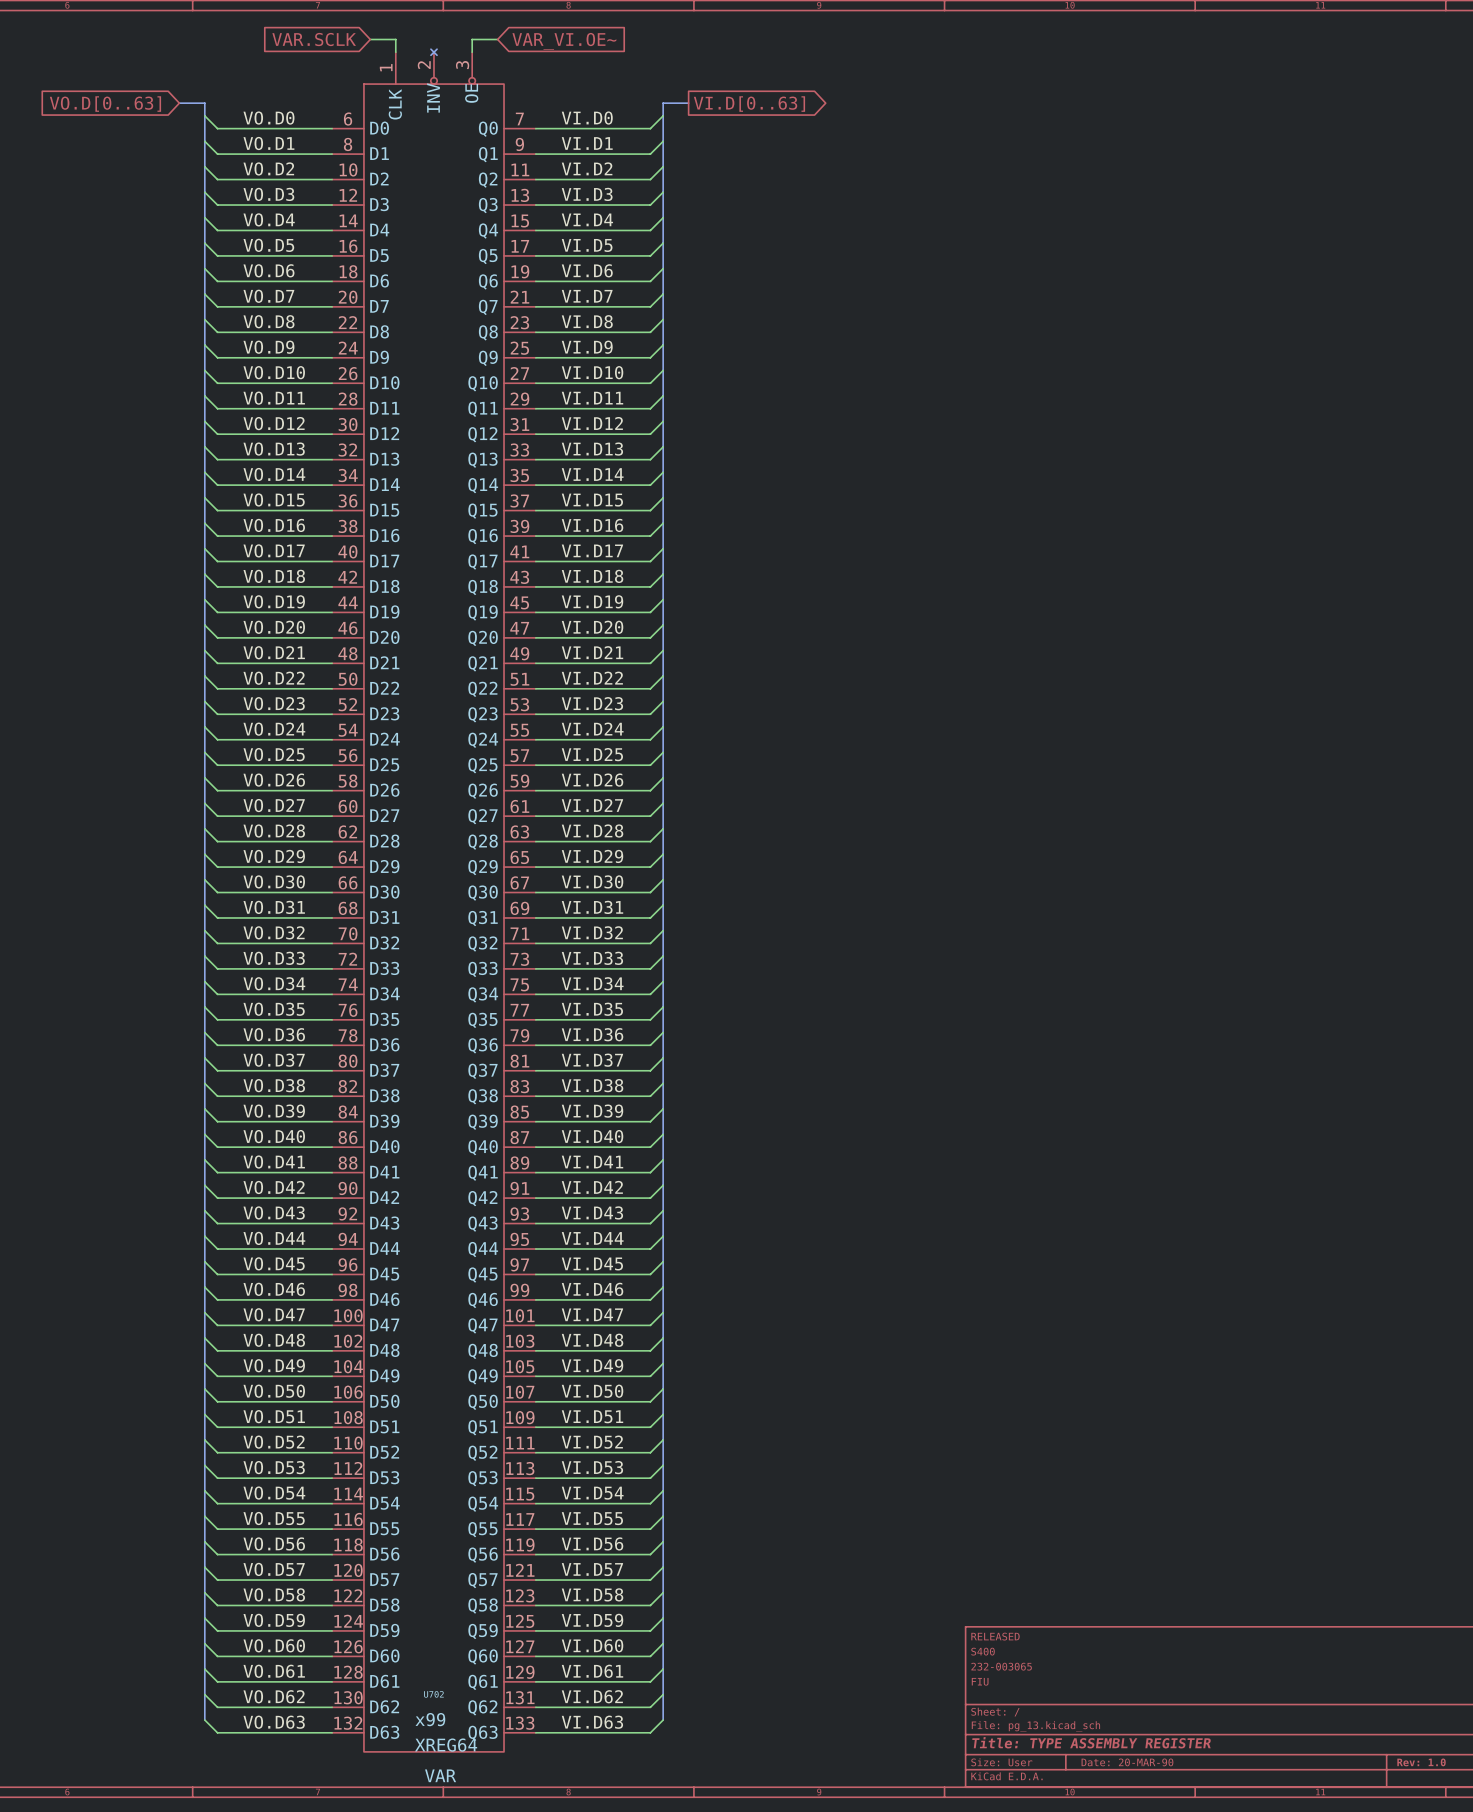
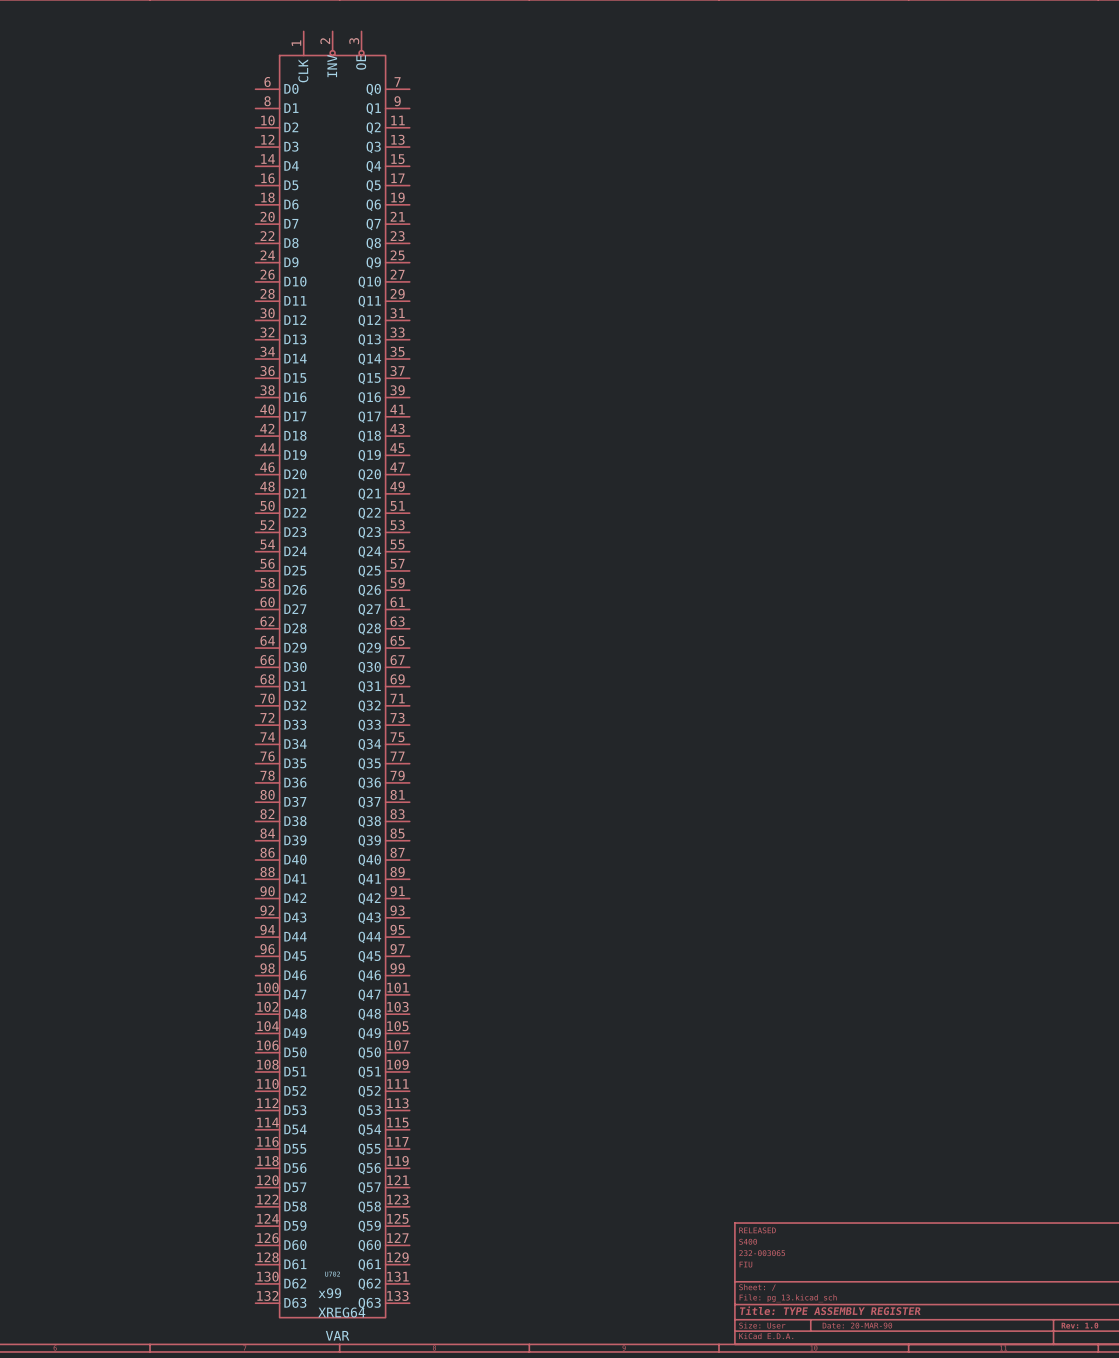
global label: VAR.SCLK (314, 39) -> none
wire: (370, 39) (395, 39) (395, 52) -> none
wire: (497, 39) (472, 39) (472, 52) -> none
global label: VAR_VI.OE~ (564, 41) -> none
no-connect mark: (433, 52) -> none
bus: (179, 103) (204, 103) (204, 1720) -> none
bus: (688, 103) (663, 103) (663, 1720) -> none
global label: VO.D[0..63] (105, 104) -> none
global label: VI.D[0..63] (749, 104) -> none
wire: (204, 115) (217, 128) (332, 128) -> none
wire: (663, 115) (650, 128) (535, 128) -> none
label: VO.D0 (268, 118) -> none
label: VI.D0 (587, 118) -> none
wire: (204, 141) (217, 154) (332, 154) -> none
wire: (663, 141) (650, 154) (535, 154) -> none
label: VO.D1 (268, 143) -> none
label: VI.D1 (587, 143) -> none
wire: (204, 166) (217, 179) (332, 179) -> none
wire: (663, 166) (650, 179) (535, 179) -> none
label: VO.D2 (268, 168) -> none
label: VI.D2 (587, 168) -> none
wire: (204, 192) (217, 205) (332, 205) -> none
wire: (663, 192) (650, 205) (535, 205) -> none
label: VO.D3 (268, 194) -> none
label: VI.D3 (587, 194) -> none
wire: (204, 217) (217, 230) (332, 230) -> none
wire: (663, 217) (650, 230) (535, 230) -> none
label: VO.D4 (269, 219) -> none
label: VI.D4 (587, 219) -> none
wire: (204, 243) (217, 255) (332, 255) -> none
wire: (663, 243) (650, 255) (535, 255) -> none
label: VO.D5 (268, 245) -> none
label: VI.D5 (587, 245) -> none
wire: (204, 268) (217, 281) (332, 281) -> none
wire: (663, 268) (650, 281) (535, 281) -> none
label: VO.D6 (268, 270) -> none
label: VI.D6 (587, 270) -> none
wire: (204, 294) (217, 306) (332, 306) -> none
wire: (663, 294) (650, 306) (535, 306) -> none
label: VO.D7 (268, 296) -> none
label: VI.D7 (587, 296) -> none
wire: (204, 319) (217, 332) (332, 332) -> none
wire: (663, 319) (650, 332) (535, 332) -> none
label: VO.D8 (268, 321) -> none
label: VI.D8 (587, 321) -> none
wire: (204, 345) (217, 357) (332, 357) -> none
wire: (663, 345) (650, 357) (535, 357) -> none
label: VO.D9 (268, 347) -> none
label: VI.D9 (587, 347) -> none
wire: (204, 370) (217, 383) (332, 383) -> none
wire: (663, 370) (650, 383) (535, 383) -> none
label: VO.D10 (274, 372) -> none
label: VI.D10 (592, 372) -> none
wire: (204, 395) (217, 408) (332, 408) -> none
wire: (663, 395) (650, 408) (535, 408) -> none
label: VO.D11 (274, 398) -> none
label: VI.D11 (592, 398) -> none
wire: (204, 421) (217, 434) (332, 434) -> none
wire: (663, 421) (650, 434) (535, 434) -> none
label: VO.D12 (274, 423) -> none
label: VI.D12 (592, 423) -> none
wire: (204, 446) (217, 459) (332, 459) -> none
wire: (663, 446) (650, 459) (535, 459) -> none
label: VO.D13 (274, 449) -> none
label: VI.D13 (592, 449) -> none
wire: (204, 472) (217, 485) (332, 485) -> none
wire: (663, 472) (650, 485) (535, 485) -> none
label: VO.D14 (274, 474) -> none
label: VI.D14 (592, 474) -> none
wire: (204, 497) (217, 510) (332, 510) -> none
wire: (663, 497) (650, 510) (535, 510) -> none
label: VO.D15 (274, 499) -> none
label: VI.D15 (592, 500) -> none
wire: (204, 523) (217, 536) (332, 536) -> none
wire: (663, 523) (650, 536) (535, 536) -> none
label: VO.D16 (274, 525) -> none
label: VI.D16 (592, 525) -> none
wire: (204, 548) (217, 561) (332, 561) -> none
wire: (663, 548) (650, 561) (535, 561) -> none
label: VO.D17 (274, 550) -> none
label: VI.D17 (592, 550) -> none
wire: (204, 574) (217, 586) (332, 586) -> none
wire: (663, 574) (650, 586) (535, 586) -> none
label: VO.D18 (274, 576) -> none
label: VI.D18 (592, 576) -> none
wire: (204, 599) (217, 612) (332, 612) -> none
wire: (663, 599) (650, 612) (535, 612) -> none
label: VO.D19 (274, 601) -> none
label: VI.D19 (592, 601) -> none
wire: (204, 625) (217, 637) (332, 637) -> none
wire: (663, 625) (650, 637) (535, 637) -> none
label: VO.D20 (274, 627) -> none
label: VI.D20 (592, 627) -> none
wire: (204, 650) (217, 663) (332, 663) -> none
wire: (663, 650) (650, 663) (535, 663) -> none
label: VO.D21 (274, 652) -> none
label: VI.D21 (592, 652) -> none
wire: (204, 676) (217, 688) (332, 688) -> none
wire: (663, 676) (650, 688) (535, 688) -> none
label: VO.D22 (274, 678) -> none
label: VI.D22 (592, 678) -> none
wire: (204, 701) (217, 714) (332, 714) -> none
wire: (663, 701) (650, 714) (535, 714) -> none
label: VO.D23 (274, 703) -> none
label: VI.D23 (592, 703) -> none
wire: (204, 727) (217, 739) (332, 739) -> none
wire: (663, 727) (650, 739) (535, 739) -> none
label: VO.D24 (274, 729) -> none
label: VI.D24 (592, 729) -> none
wire: (204, 752) (217, 765) (332, 765) -> none
wire: (663, 752) (650, 765) (535, 765) -> none
label: VO.D25 (274, 754) -> none
label: VI.D25 (592, 754) -> none
wire: (204, 777) (217, 790) (332, 790) -> none
wire: (663, 777) (650, 790) (535, 790) -> none
label: VO.D26 (274, 780) -> none
label: VI.D26 (592, 780) -> none
wire: (204, 803) (217, 816) (332, 816) -> none
wire: (663, 803) (650, 816) (535, 816) -> none
label: VO.D27 (274, 805) -> none
label: VI.D27 (592, 805) -> none
wire: (204, 828) (217, 841) (332, 841) -> none
wire: (663, 828) (650, 841) (535, 841) -> none
label: VO.D28 (274, 831) -> none
label: VI.D28 (592, 831) -> none
wire: (204, 854) (217, 867) (332, 867) -> none
wire: (663, 854) (650, 867) (535, 867) -> none
label: VO.D29 (274, 856) -> none
label: VI.D29 (592, 856) -> none
wire: (204, 879) (217, 892) (332, 892) -> none
wire: (663, 879) (650, 892) (535, 892) -> none
label: VO.D30 (274, 881) -> none
label: VI.D30 (592, 881) -> none
wire: (204, 905) (217, 917) (332, 917) -> none
wire: (663, 905) (650, 917) (535, 917) -> none
label: VO.D31 (274, 907) -> none
label: VI.D31 (592, 907) -> none
wire: (204, 930) (217, 943) (332, 943) -> none
wire: (663, 930) (650, 943) (535, 943) -> none
label: VO.D32 (274, 932) -> none
label: VI.D32 (592, 932) -> none
wire: (204, 956) (217, 968) (332, 968) -> none
wire: (663, 956) (650, 968) (535, 968) -> none
label: VO.D33 (274, 958) -> none
label: VI.D33 (592, 958) -> none
wire: (204, 981) (217, 994) (332, 994) -> none
wire: (663, 981) (650, 994) (535, 994) -> none
label: VO.D34 (274, 983) -> none
label: VI.D34 (592, 983) -> none
wire: (204, 1007) (217, 1019) (332, 1019) -> none
wire: (663, 1007) (650, 1019) (535, 1019) -> none
label: VO.D35 (274, 1009) -> none
label: VI.D35 (592, 1009) -> none
wire: (204, 1032) (217, 1045) (332, 1045) -> none
wire: (663, 1032) (650, 1045) (535, 1045) -> none
label: VO.D36 (274, 1034) -> none
label: VI.D36 (592, 1034) -> none
wire: (204, 1058) (217, 1070) (332, 1070) -> none
wire: (663, 1058) (650, 1070) (535, 1070) -> none
label: VO.D37 (274, 1060) -> none
label: VI.D37 (592, 1060) -> none
wire: (204, 1083) (217, 1096) (332, 1096) -> none
wire: (663, 1083) (650, 1096) (535, 1096) -> none
label: VO.D38 (274, 1085) -> none
label: VI.D38 (592, 1085) -> none
wire: (204, 1108) (217, 1121) (332, 1121) -> none
wire: (663, 1108) (650, 1121) (535, 1121) -> none
label: VO.D39 (274, 1111) -> none
label: VI.D39 (592, 1111) -> none
wire: (204, 1134) (217, 1147) (332, 1147) -> none
wire: (663, 1134) (650, 1147) (535, 1147) -> none
label: VO.D40 (274, 1136) -> none
label: VI.D40 (592, 1136) -> none
wire: (204, 1159) (217, 1172) (332, 1172) -> none
wire: (663, 1159) (650, 1172) (535, 1172) -> none
label: VO.D41 (274, 1162) -> none
label: VI.D41 (592, 1162) -> none
wire: (204, 1185) (217, 1198) (332, 1198) -> none
wire: (663, 1185) (650, 1198) (535, 1198) -> none
label: VO.D42 (274, 1187) -> none
label: VI.D42 (592, 1187) -> none
wire: (204, 1210) (217, 1223) (332, 1223) -> none
wire: (663, 1210) (650, 1223) (535, 1223) -> none
label: VO.D43 (274, 1212) -> none
label: VI.D43 (592, 1212) -> none
wire: (204, 1236) (217, 1249) (332, 1249) -> none
wire: (663, 1236) (650, 1249) (535, 1249) -> none
label: VO.D44 (274, 1238) -> none
label: VI.D44 (592, 1238) -> none
wire: (204, 1261) (217, 1274) (332, 1274) -> none
wire: (663, 1261) (650, 1274) (535, 1274) -> none
label: VO.D45 (274, 1263) -> none
label: VI.D45 (592, 1263) -> none
wire: (204, 1287) (217, 1299) (332, 1299) -> none
wire: (663, 1287) (650, 1299) (535, 1299) -> none
label: VO.D46 (274, 1289) -> none
label: VI.D46 (592, 1289) -> none
wire: (204, 1312) (217, 1325) (332, 1325) -> none
wire: (663, 1312) (650, 1325) (535, 1325) -> none
label: VO.D47 (274, 1314) -> none
label: VI.D47 (592, 1314) -> none
wire: (204, 1338) (217, 1350) (332, 1350) -> none
wire: (663, 1338) (650, 1350) (535, 1350) -> none
label: VO.D48 (274, 1340) -> none
label: VI.D48 (592, 1340) -> none
wire: (204, 1363) (217, 1376) (332, 1376) -> none
wire: (663, 1363) (650, 1376) (535, 1376) -> none
label: VO.D49 (274, 1365) -> none
label: VI.D49 (592, 1365) -> none
wire: (204, 1389) (217, 1401) (332, 1401) -> none
wire: (663, 1389) (650, 1401) (535, 1401) -> none
label: VO.D50 (274, 1391) -> none
label: VI.D50 (592, 1391) -> none
wire: (204, 1414) (217, 1427) (332, 1427) -> none
wire: (663, 1414) (650, 1427) (535, 1427) -> none
label: VO.D51 (274, 1416) -> none
label: VI.D51 (592, 1416) -> none
wire: (204, 1439) (217, 1452) (332, 1452) -> none
wire: (663, 1439) (650, 1452) (535, 1452) -> none
label: VO.D52 (274, 1442) -> none
label: VI.D52 (592, 1442) -> none
wire: (204, 1465) (217, 1478) (332, 1478) -> none
wire: (663, 1465) (650, 1478) (535, 1478) -> none
label: VO.D53 (274, 1467) -> none
label: VI.D53 (592, 1467) -> none
wire: (204, 1490) (217, 1503) (332, 1503) -> none
wire: (663, 1490) (650, 1503) (535, 1503) -> none
label: VO.D54 (274, 1493) -> none
label: VI.D54 (592, 1493) -> none
wire: (204, 1516) (217, 1529) (332, 1529) -> none
wire: (663, 1516) (650, 1529) (535, 1529) -> none
label: VO.D55 (274, 1518) -> none
label: VI.D55 (592, 1518) -> none
wire: (204, 1541) (217, 1554) (332, 1554) -> none
wire: (663, 1541) (650, 1554) (535, 1554) -> none
label: VO.D56 (274, 1543) -> none
label: VI.D56 (592, 1543) -> none
wire: (204, 1567) (217, 1580) (332, 1580) -> none
wire: (663, 1567) (650, 1580) (535, 1580) -> none
label: VO.D57 (274, 1569) -> none
label: VI.D57 (592, 1569) -> none
wire: (204, 1592) (217, 1605) (332, 1605) -> none
wire: (663, 1592) (650, 1605) (535, 1605) -> none
label: VO.D58 (274, 1594) -> none
label: VI.D58 (592, 1594) -> none
wire: (204, 1618) (217, 1630) (332, 1630) -> none
wire: (663, 1618) (650, 1630) (535, 1630) -> none
label: VO.D59 (274, 1620) -> none
label: VI.D59 (592, 1620) -> none
wire: (204, 1643) (217, 1656) (332, 1656) -> none
wire: (663, 1643) (650, 1656) (535, 1656) -> none
label: VO.D60 (274, 1645) -> none
label: VI.D60 (592, 1645) -> none
wire: (204, 1669) (217, 1681) (332, 1681) -> none
wire: (663, 1669) (650, 1681) (535, 1681) -> none
label: VO.D61 (274, 1671) -> none
label: VI.D61 (592, 1671) -> none
wire: (204, 1694) (217, 1707) (332, 1707) -> none
wire: (663, 1694) (650, 1707) (535, 1707) -> none
label: VO.D62 (274, 1696) -> none
label: VI.D62 (592, 1696) -> none
wire: (204, 1720) (217, 1732) (332, 1732) -> none
wire: (663, 1720) (650, 1732) (535, 1732) -> none
label: VO.D63 (274, 1722) -> none
label: VI.D63 (592, 1722) -> none

